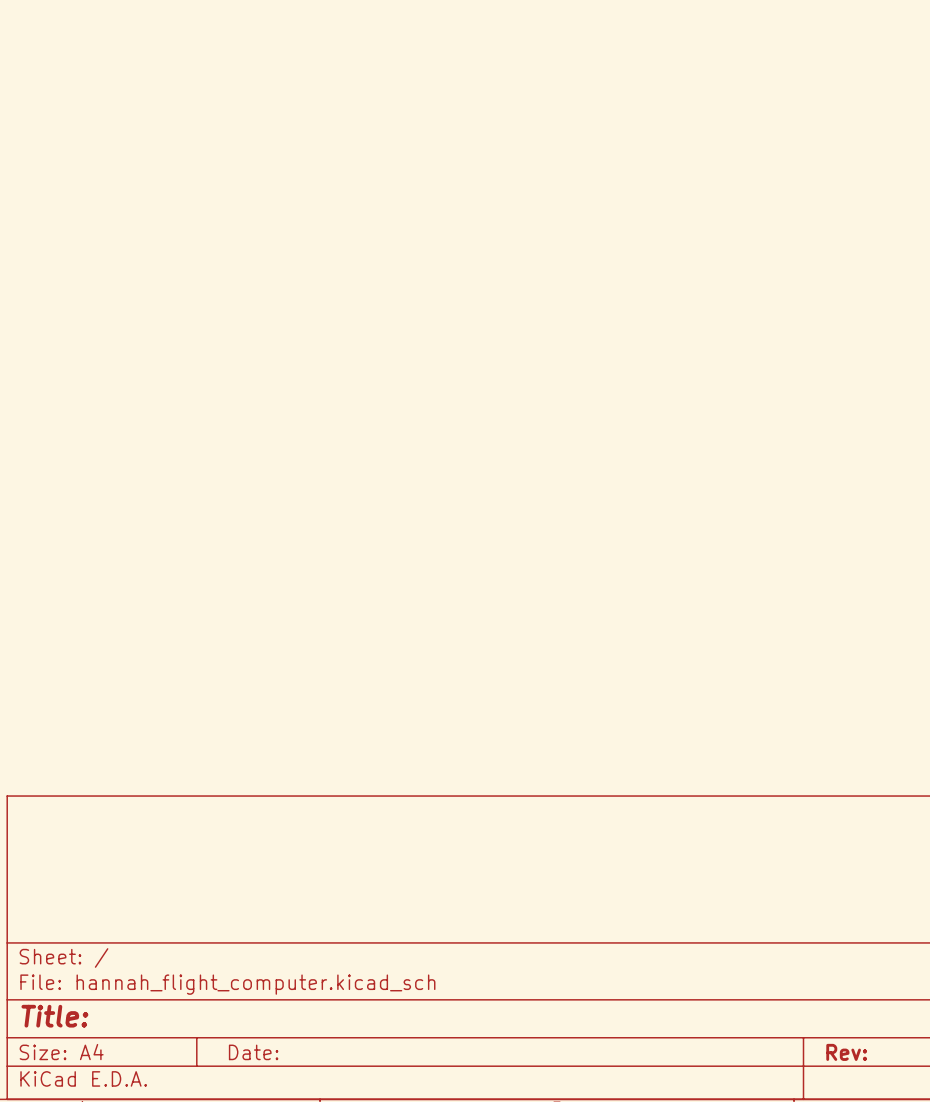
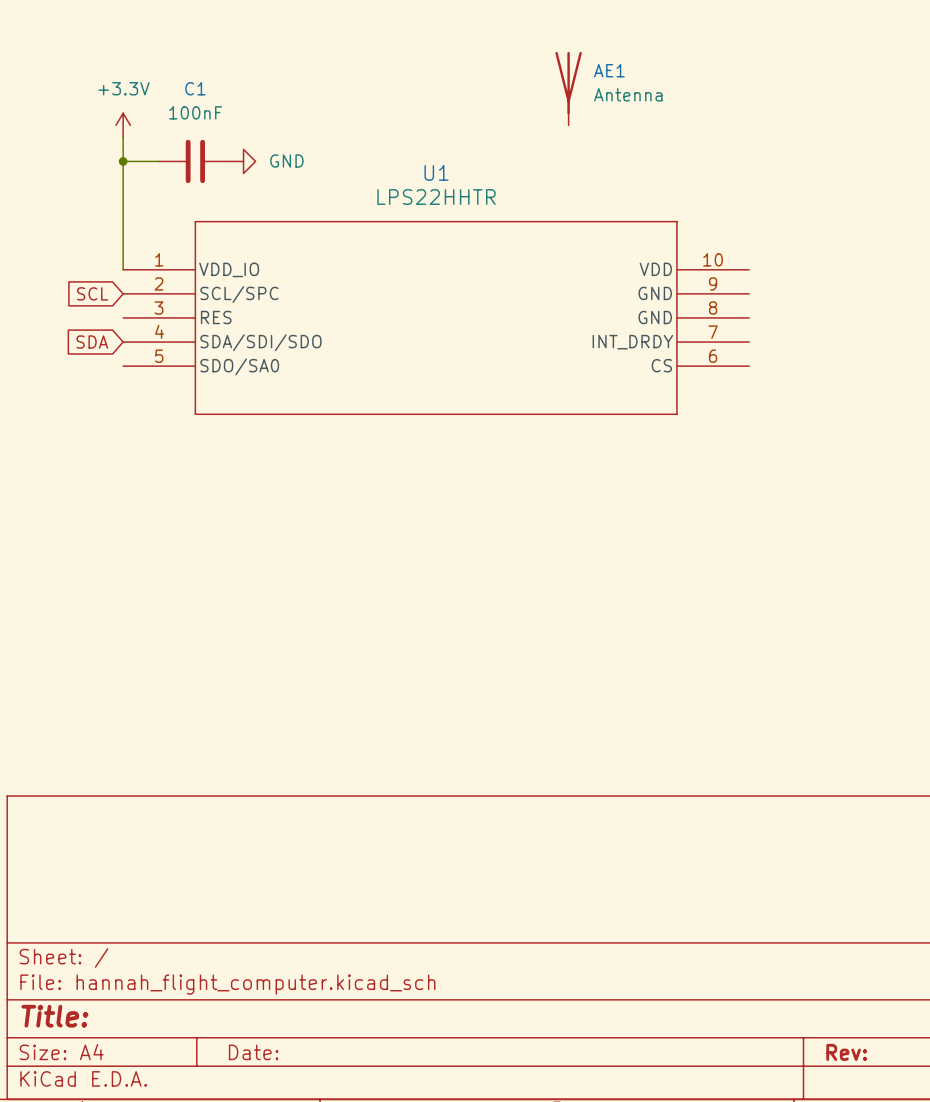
AE1: none -> Antenna (568, 88)
power symbol: none -> +3.3V (123, 125)
wire: none -> (123, 137) (123, 269)
wire: none -> (123, 161) (159, 161)
junction: none -> (123, 161)
C1: none -> 100nF (195, 161)
power symbol: none -> GND (243, 161)
global label: none -> SCL (92, 293)
U1: none -> LPS22HHTR (436, 317)
global label: none -> SDA (92, 342)

